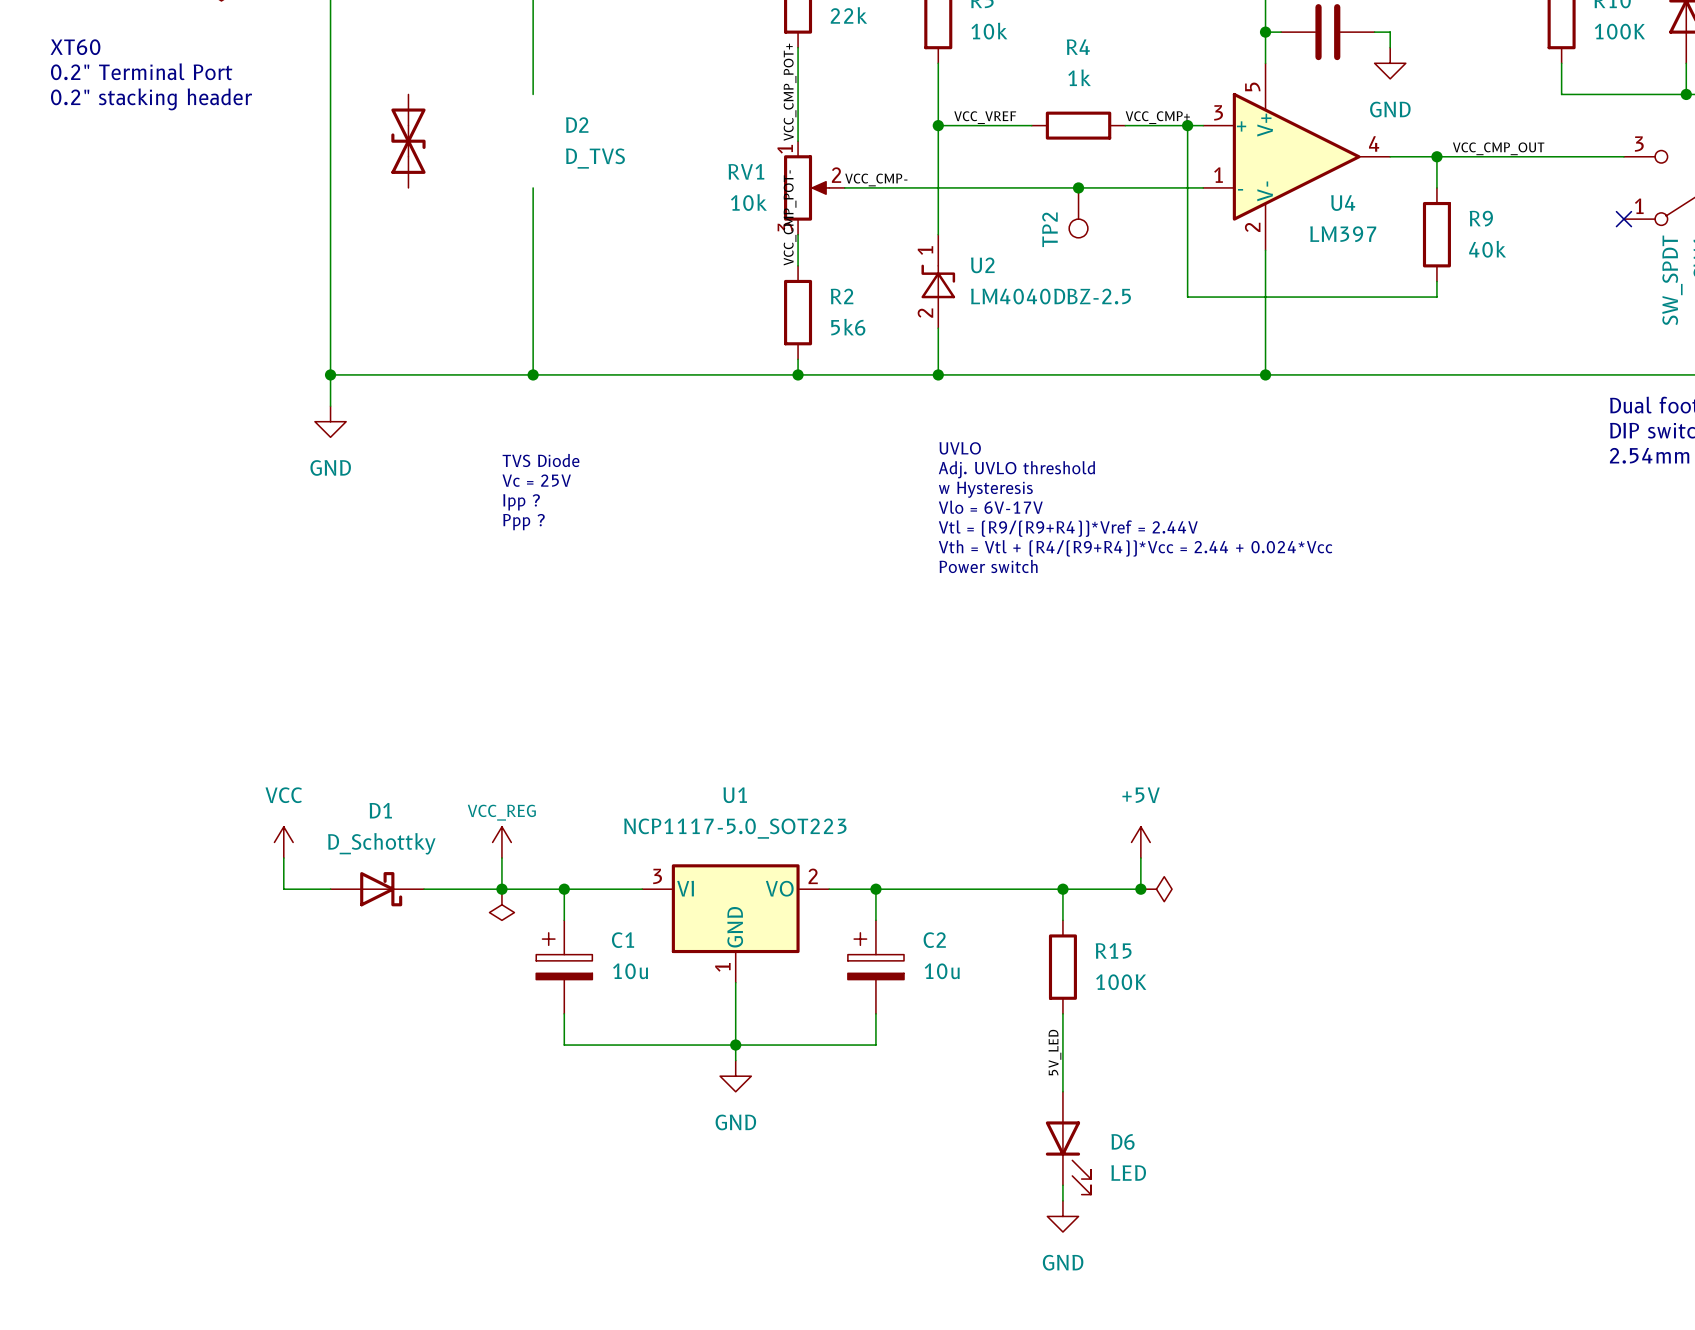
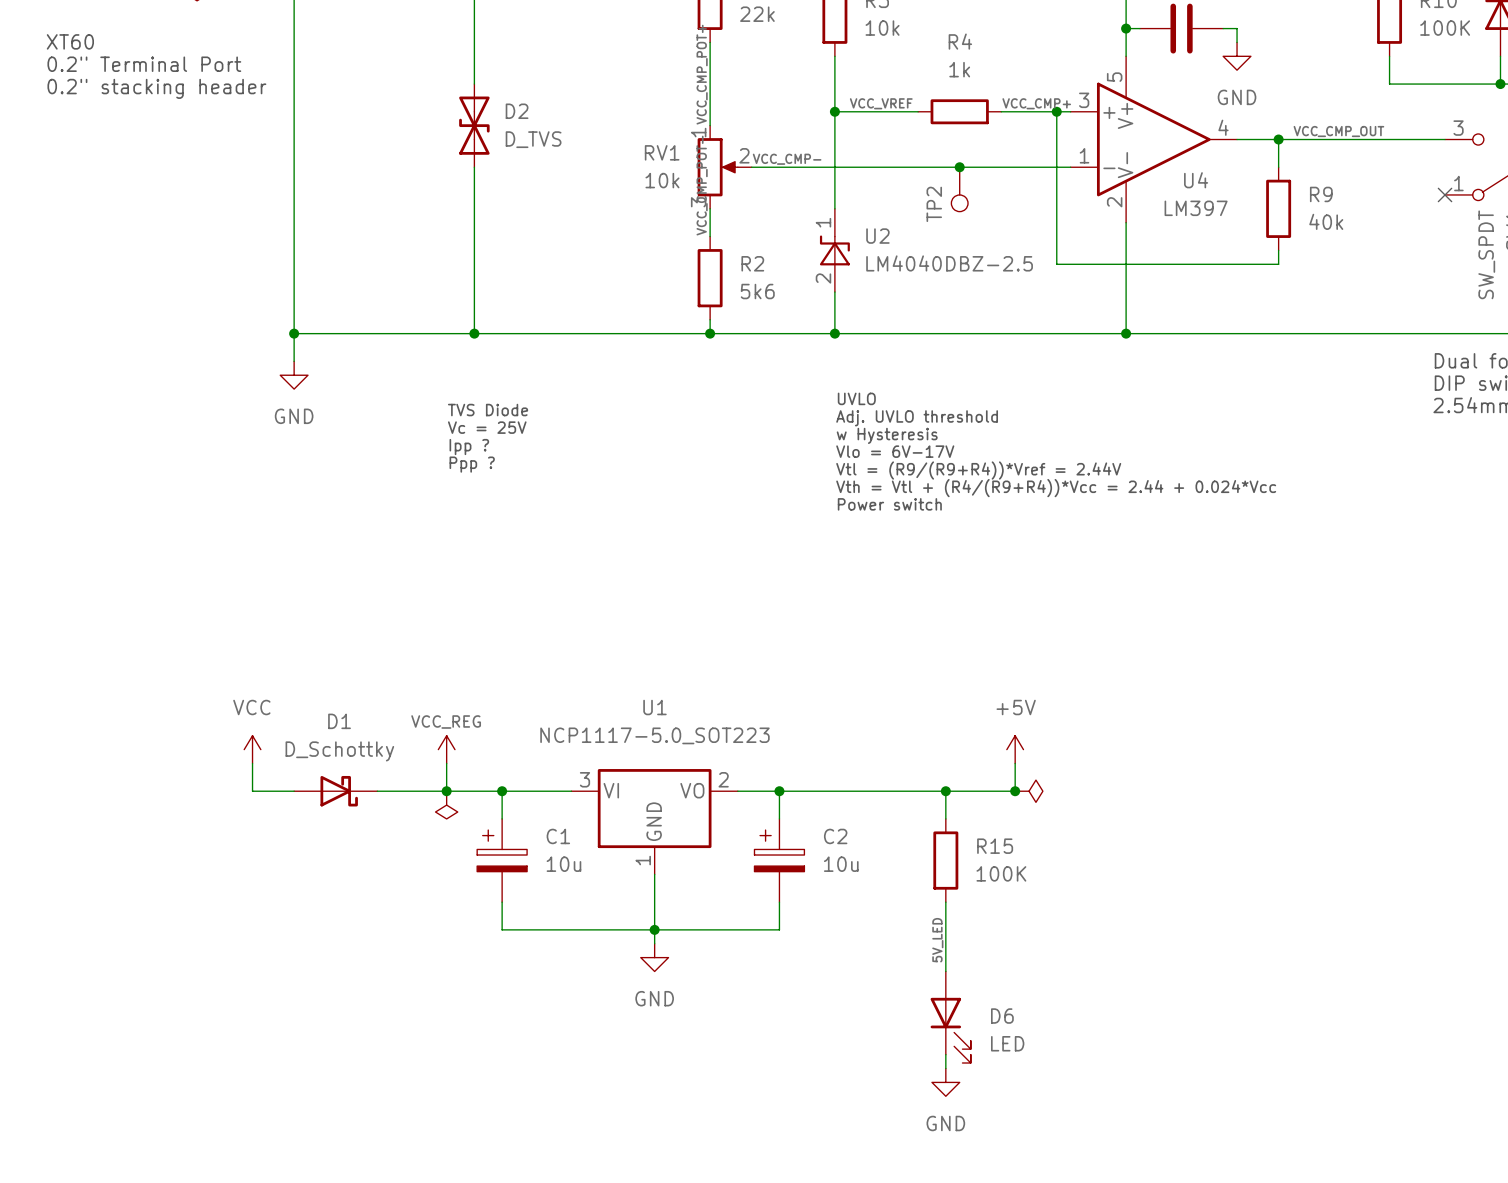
D2 position: (408, 141) -> (474, 125)

